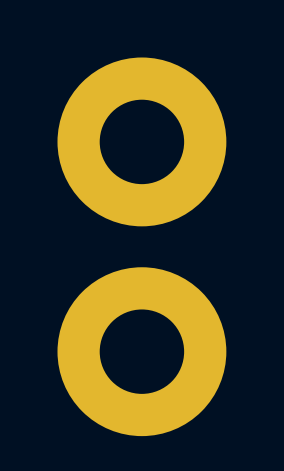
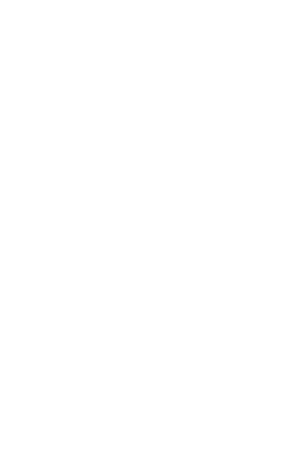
part: (141, 141) -> none
part: (141, 351) -> none

